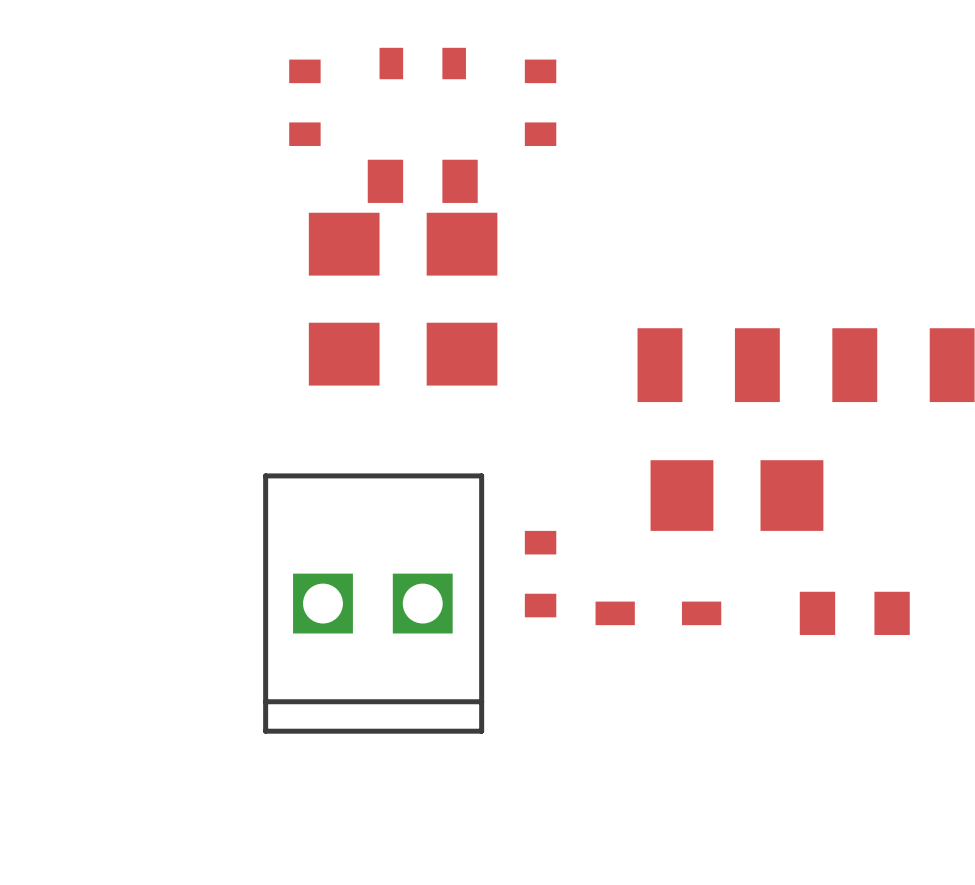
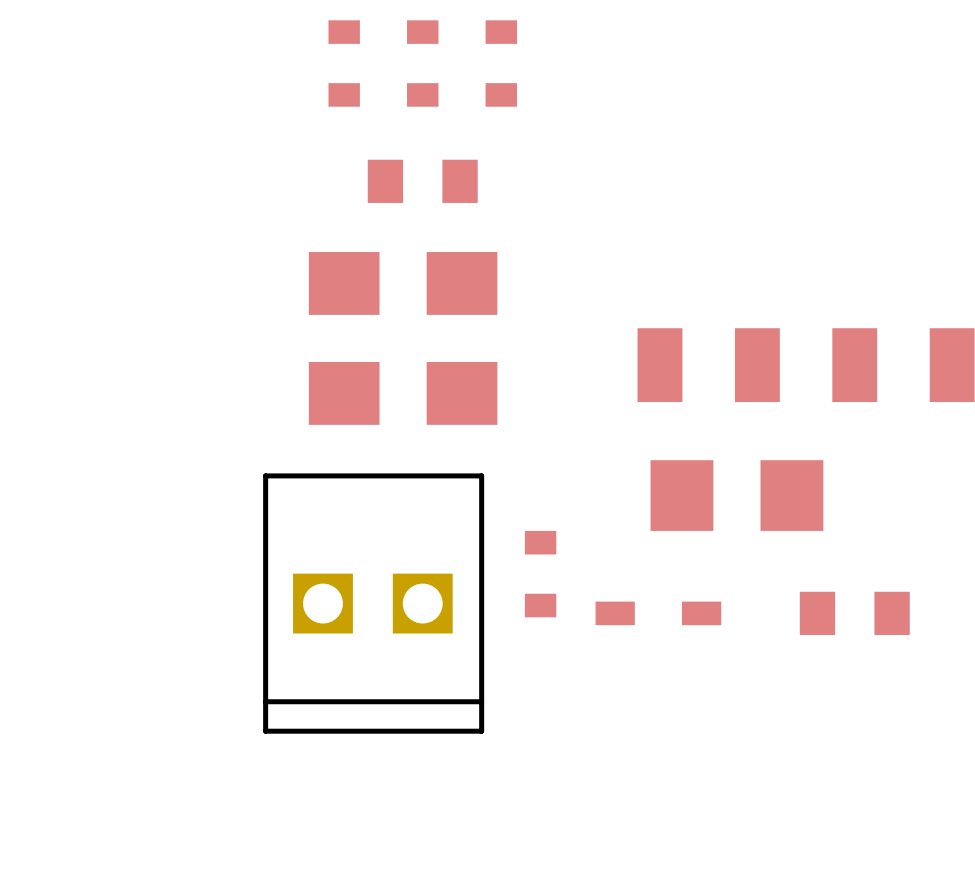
part rotation: 0° (422, 63) -> 90° clockwise (422, 63)
part position: (304, 102) -> (344, 63)
part position: (540, 102) -> (501, 63)
part position: (344, 299) -> (344, 338)
part position: (462, 299) -> (462, 338)

